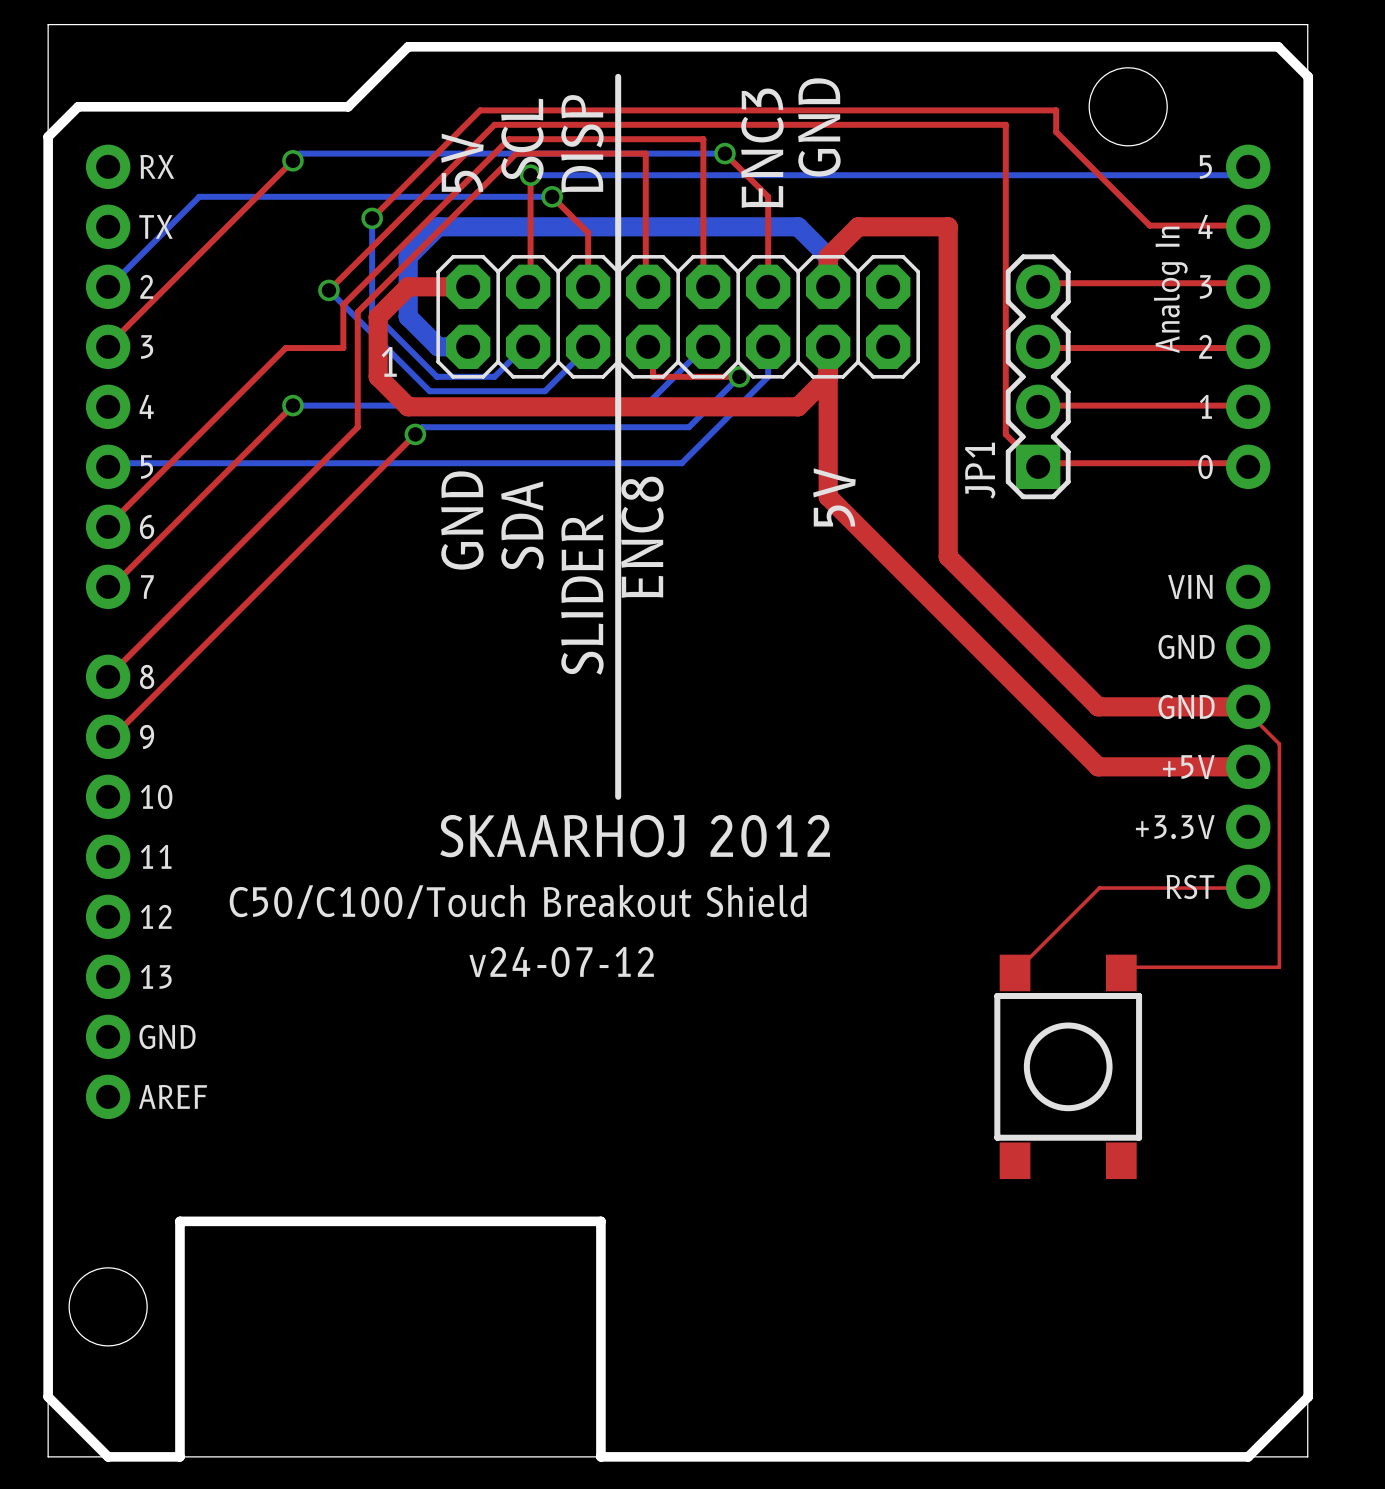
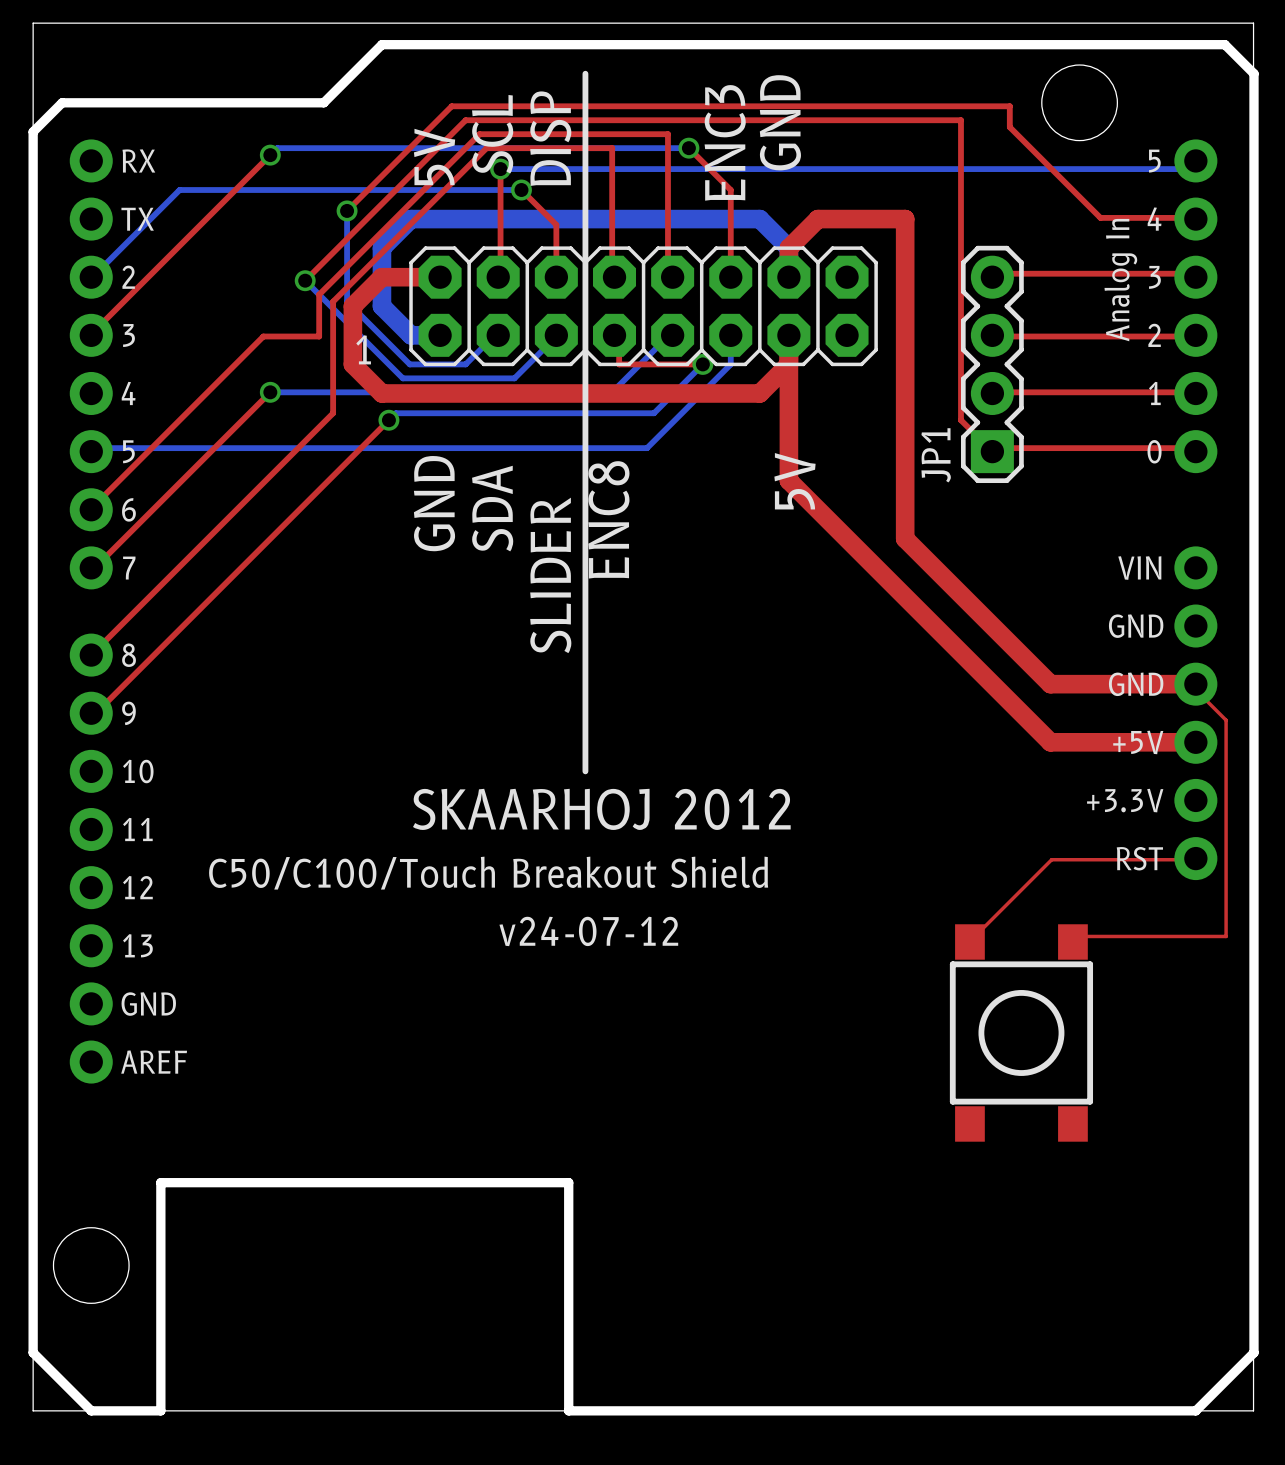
text position: v24-07-12 (561, 962) -> v24-07-12 (588, 931)

